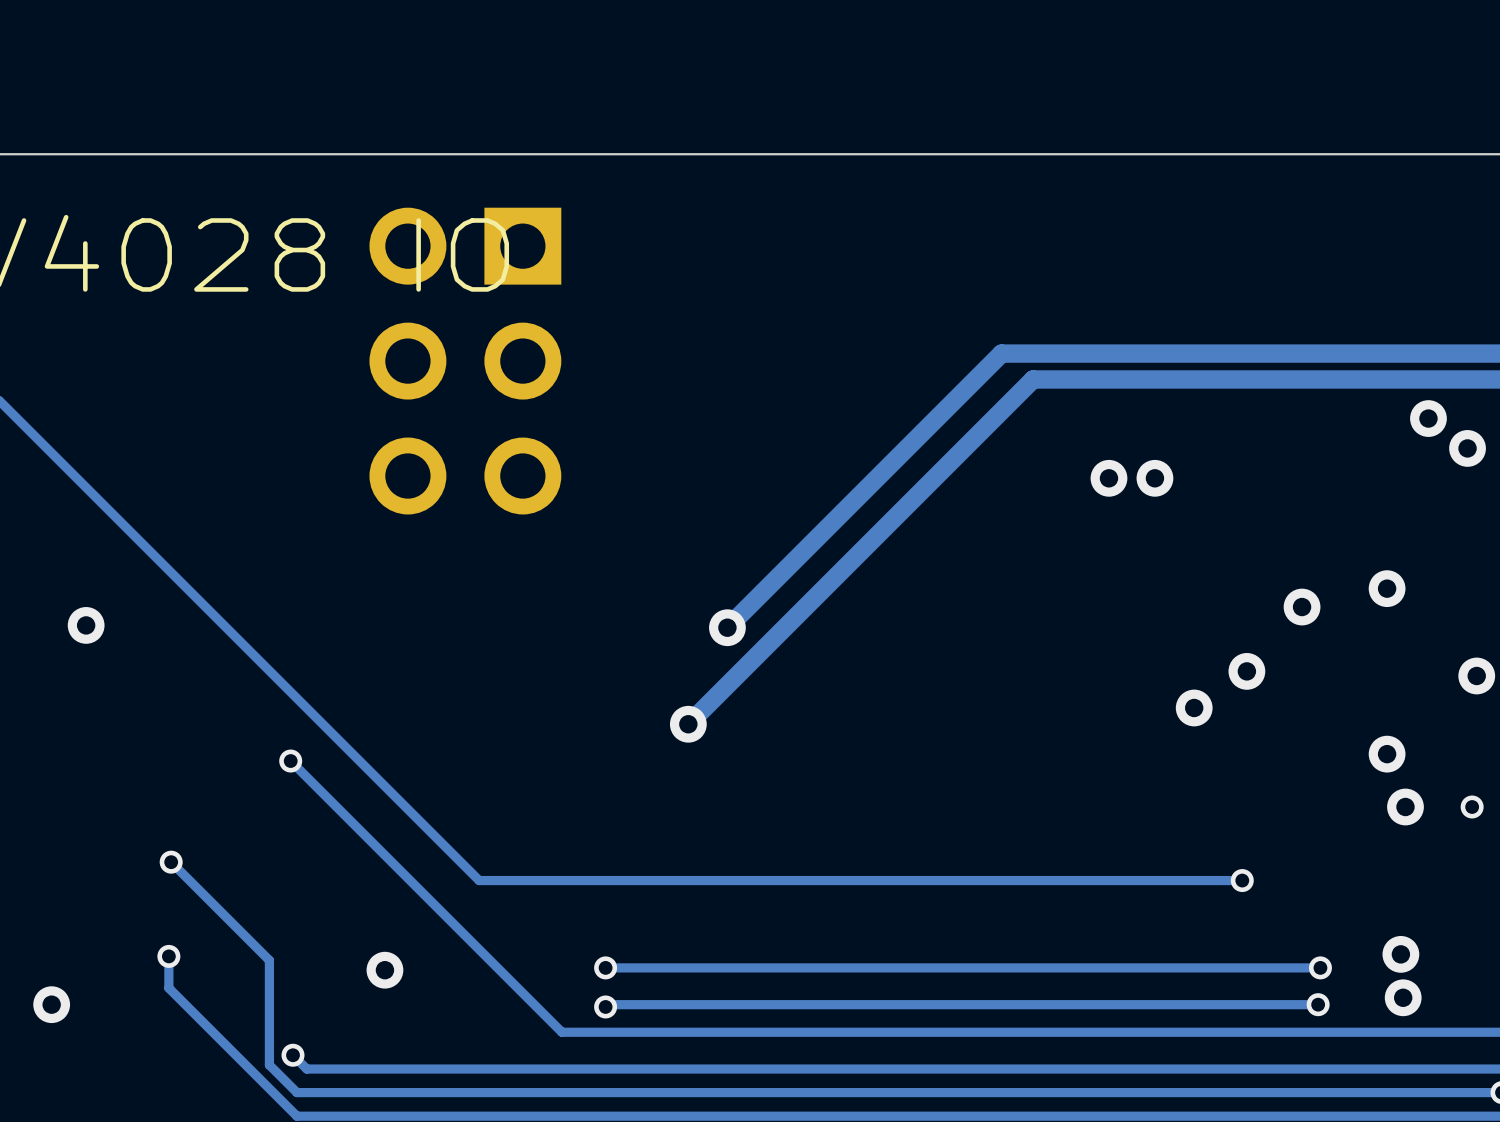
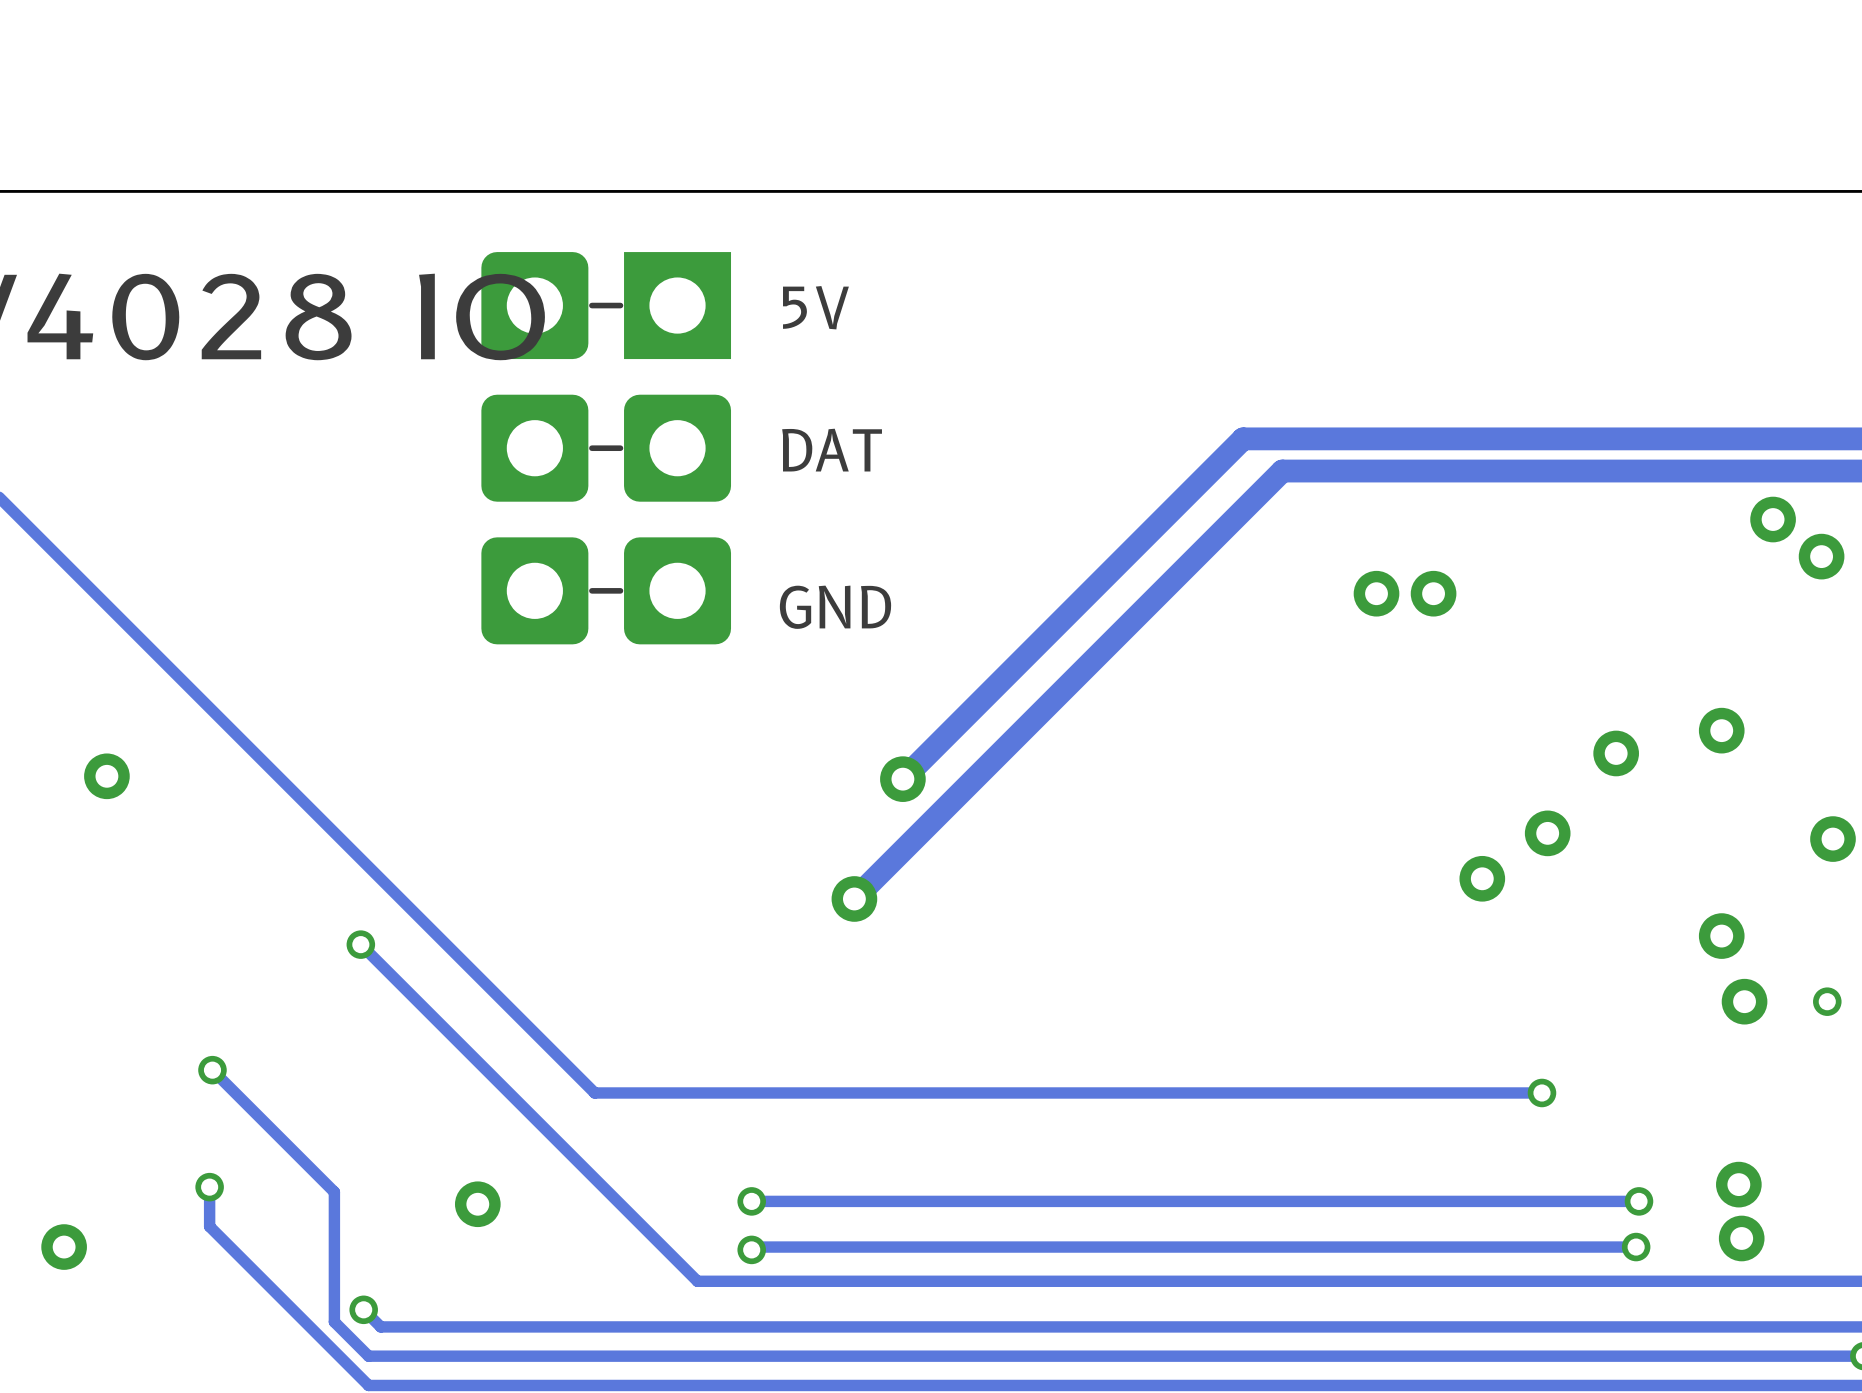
part footprint: [369, 207, 562, 515] -> [481, 252, 732, 645]
line: none -> (620, 305) (591, 305)
text: none -> 5V (815, 307)
line: none -> (620, 448) (591, 448)
text: none -> DAT (832, 450)
line: none -> (620, 590) (591, 590)
text: none -> GND (835, 607)

